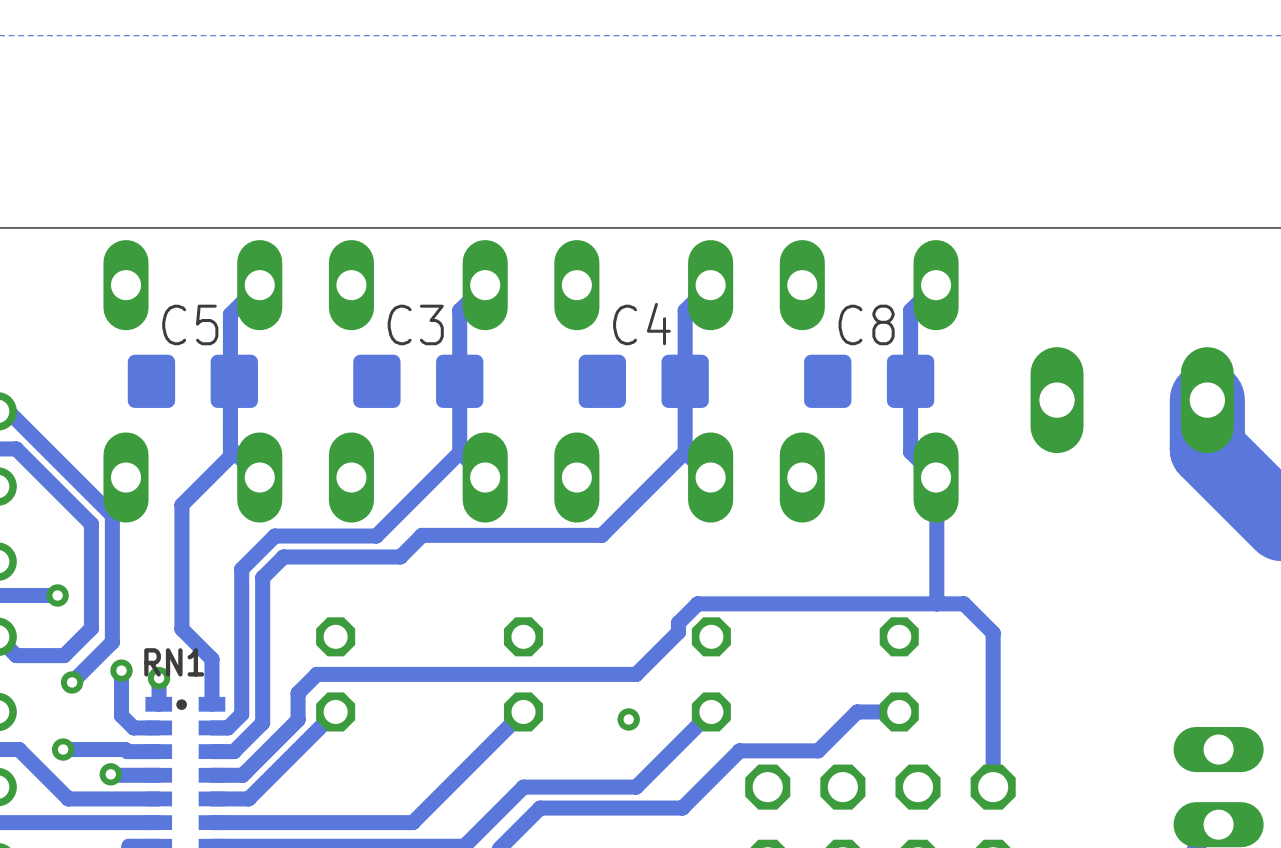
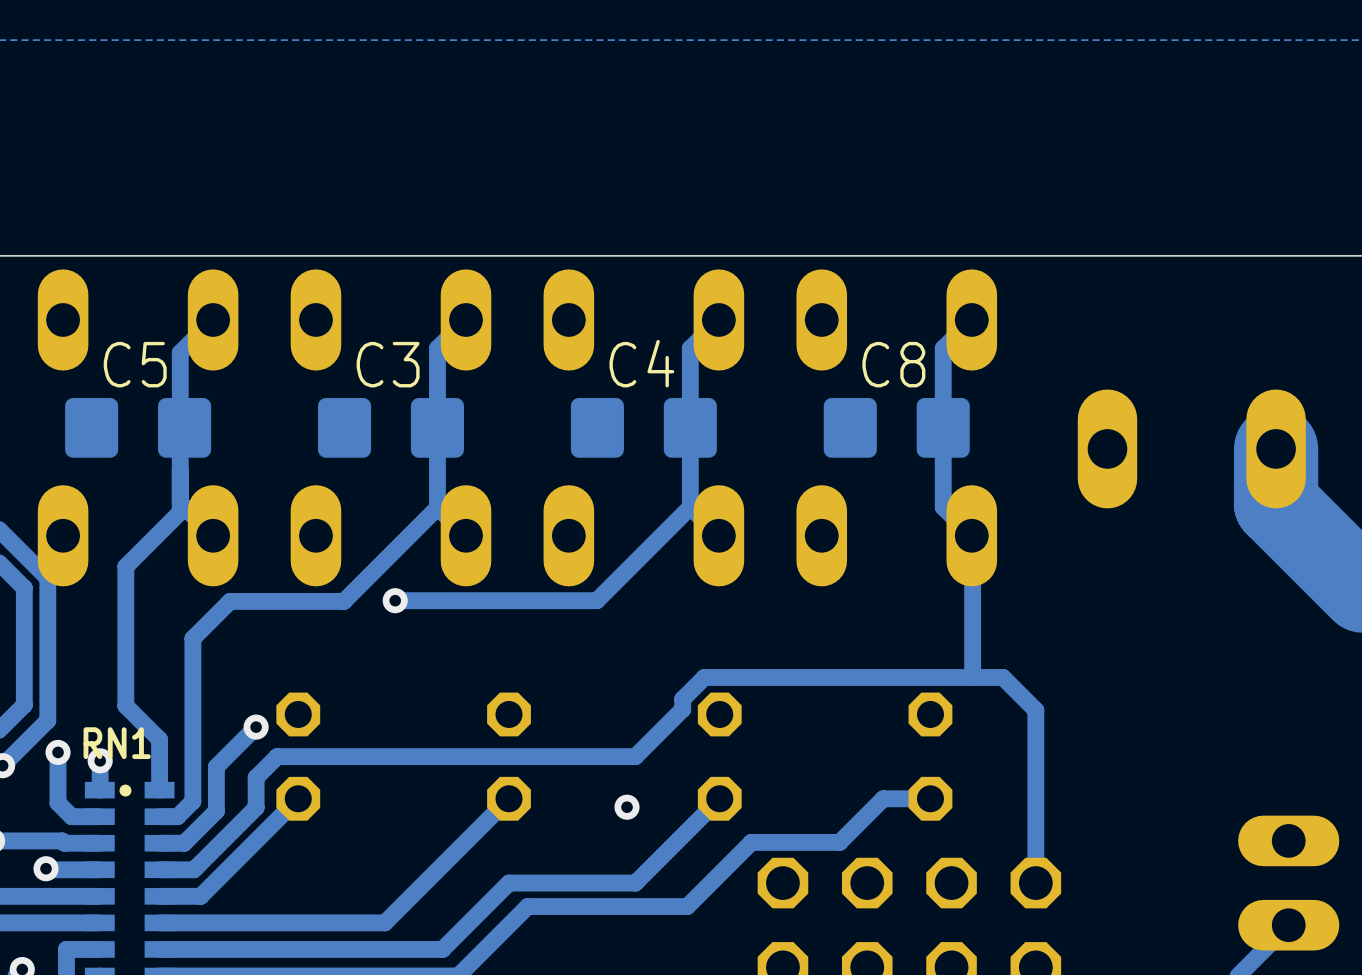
track: (422, 535) (400, 556) (283, 556) (262, 577) (262, 683) -> (256, 727) (216, 766)
via: none -> (395, 600)
via: none -> (256, 727)

